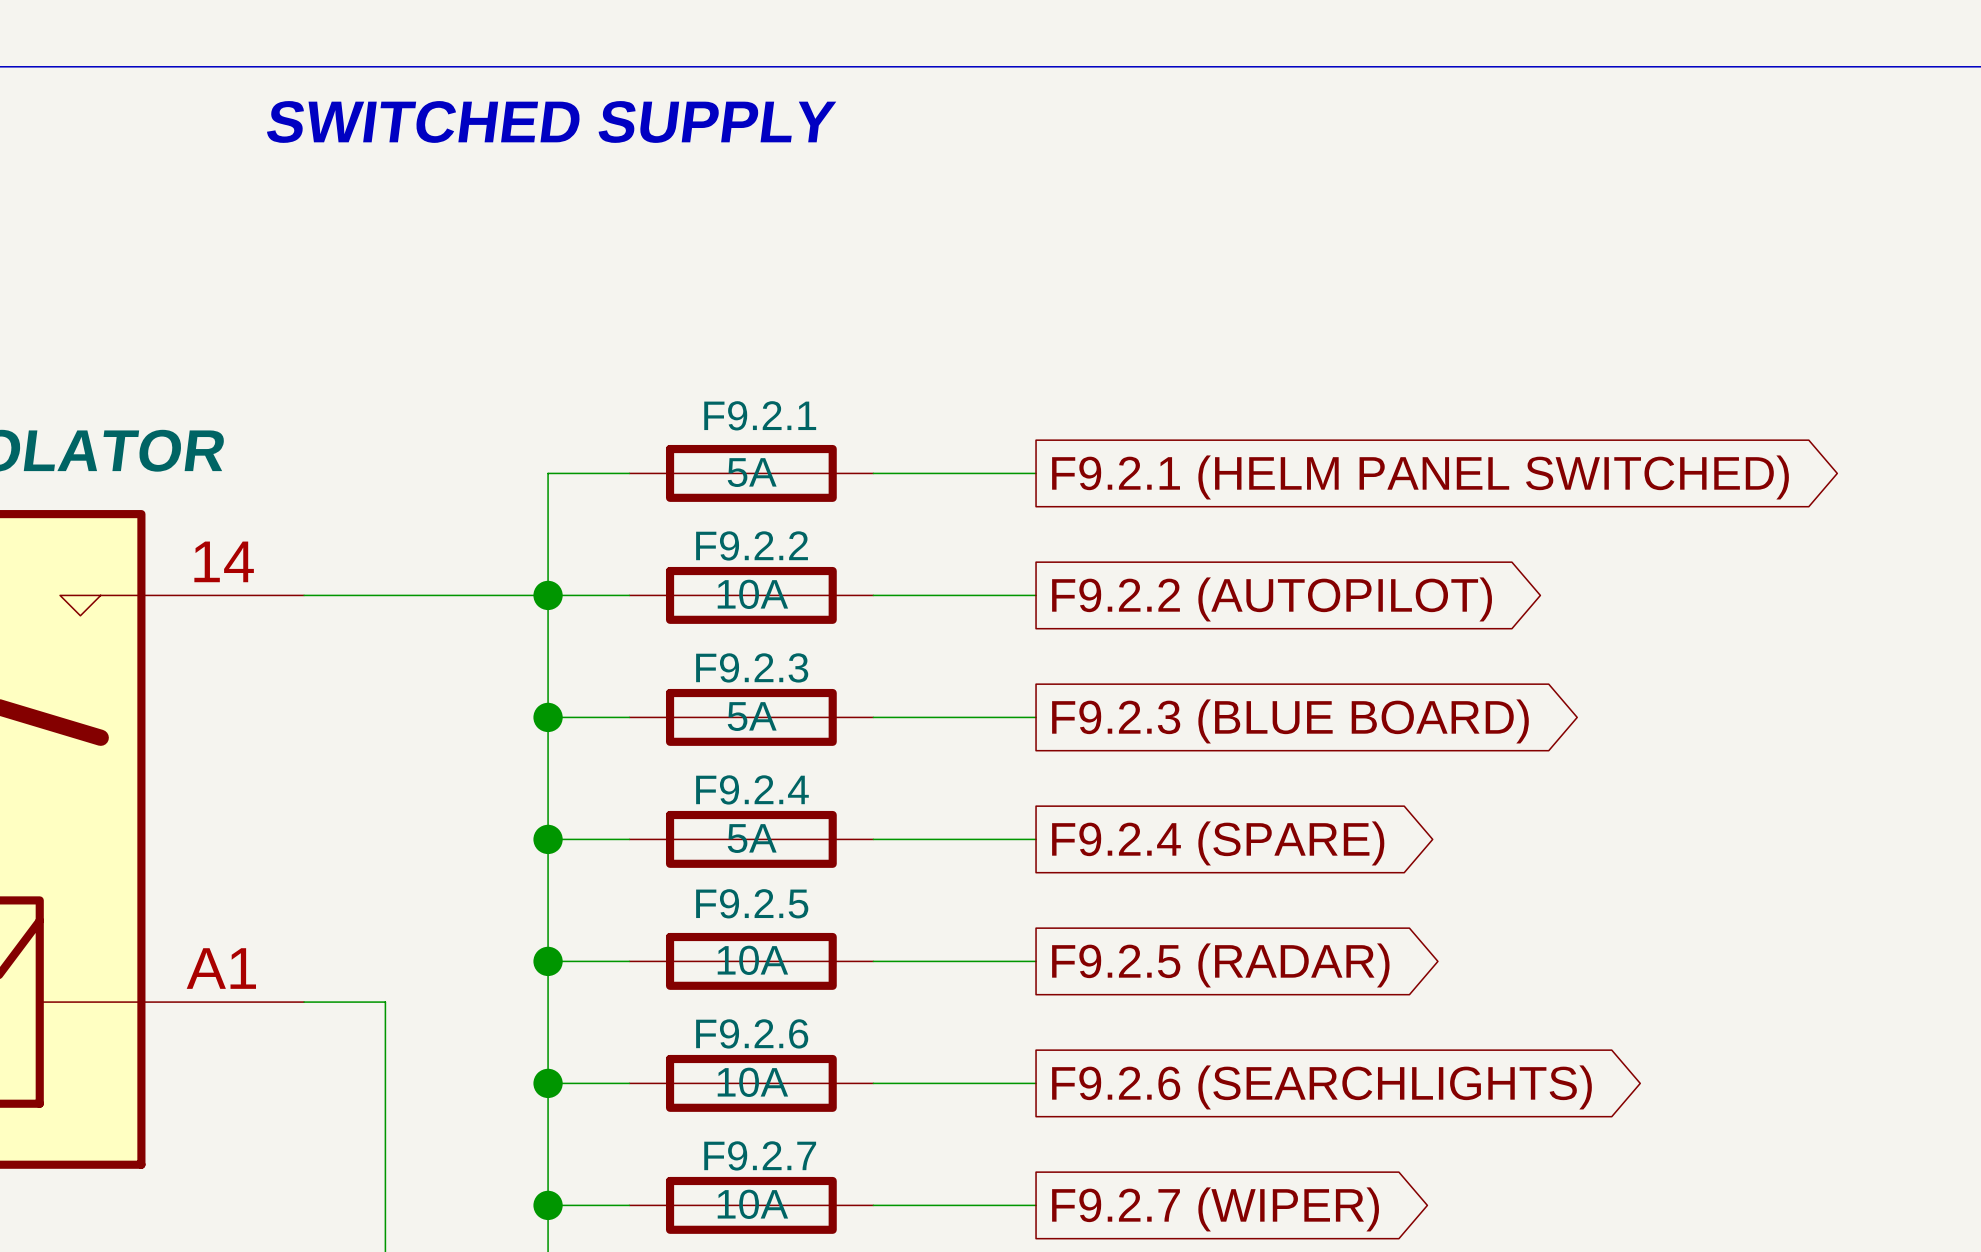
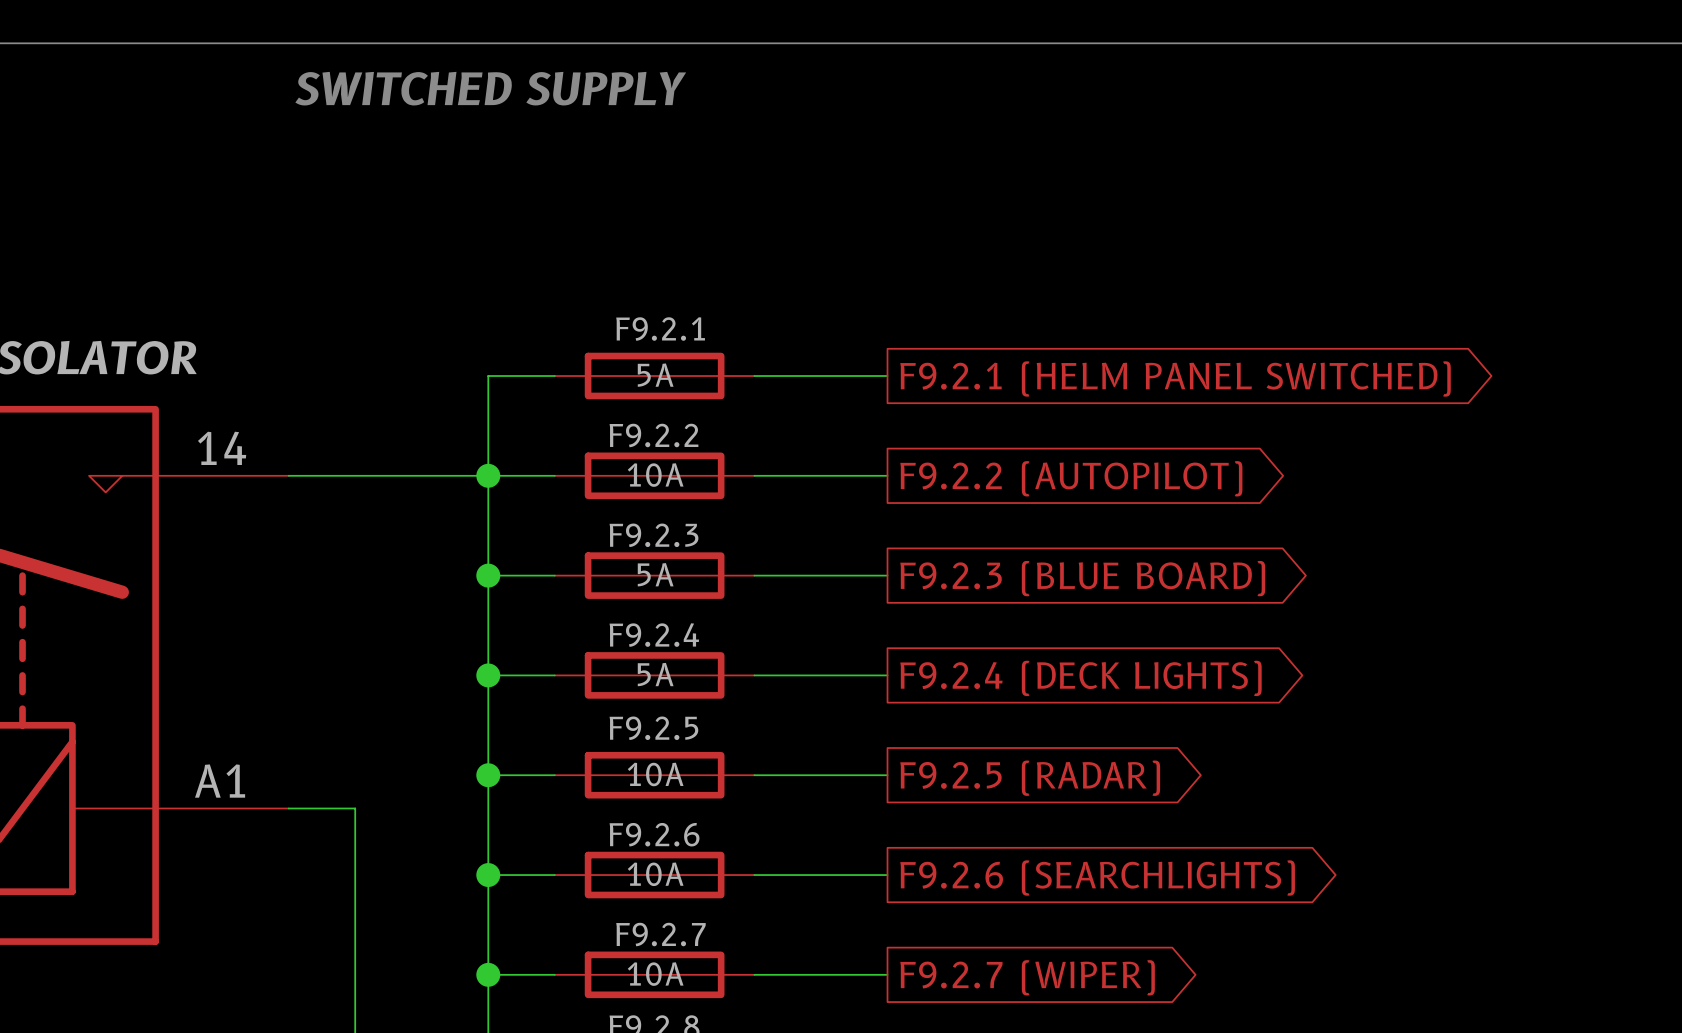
global label: F9.2.4 (SPARE) (1218, 843) -> F9.2.4 (DECK LIGHTS) (1080, 678)

